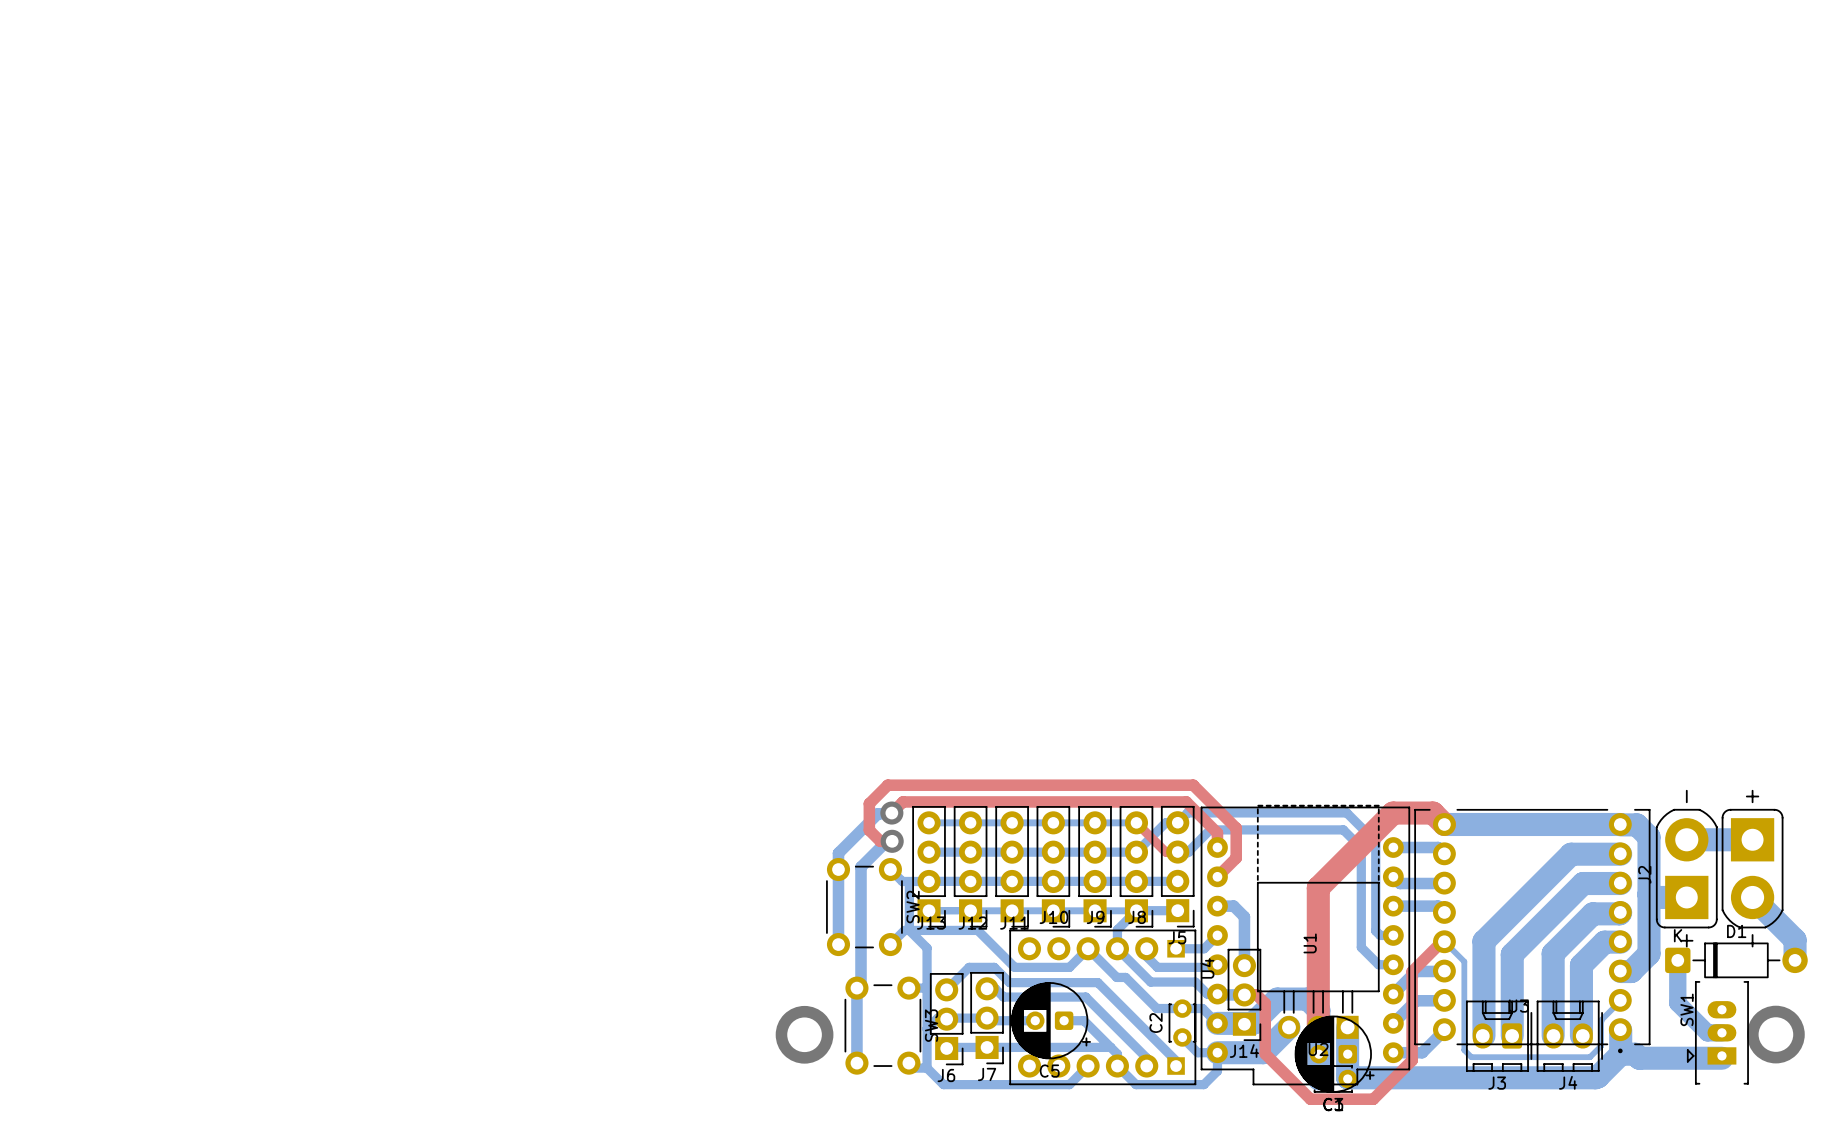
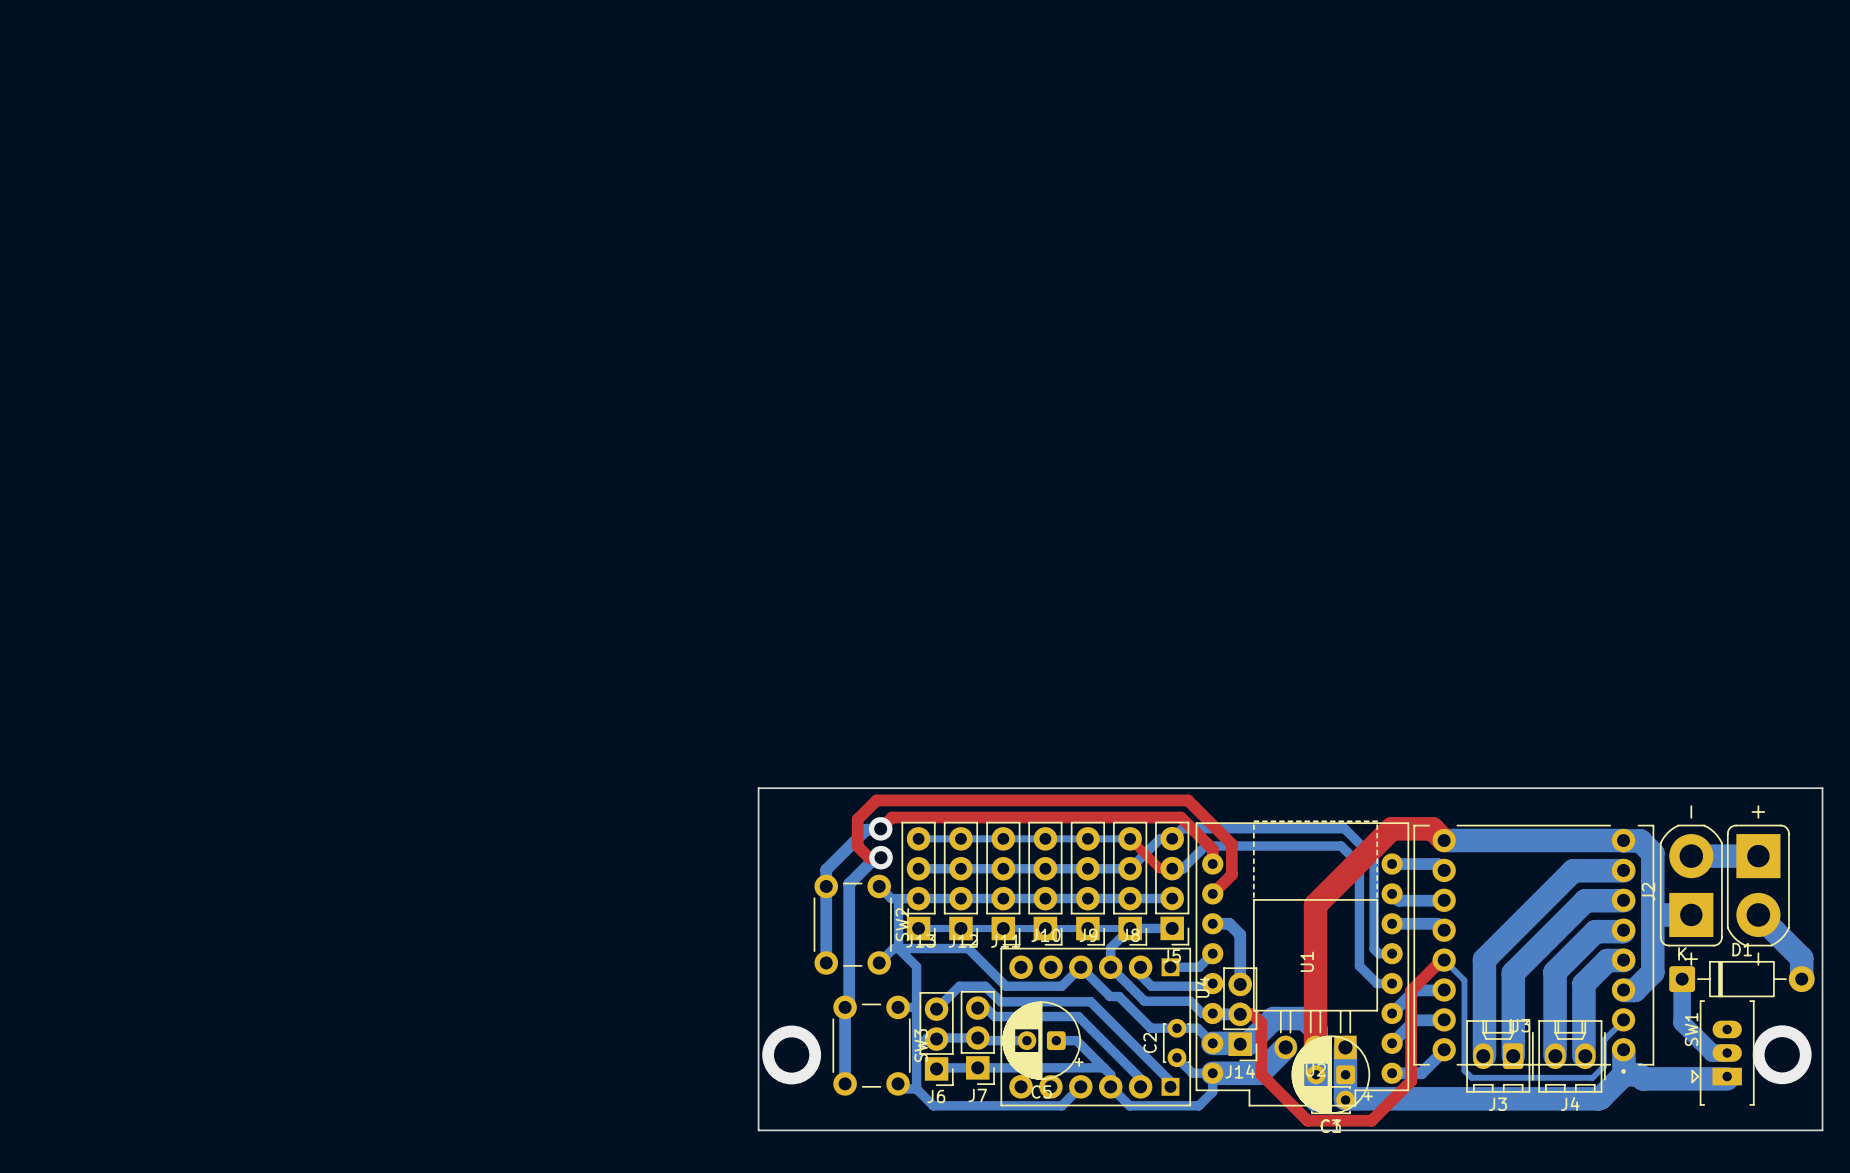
board edge: none -> (758, 788) (1822, 788) (1822, 1130) (758, 1130) (758, 788)

